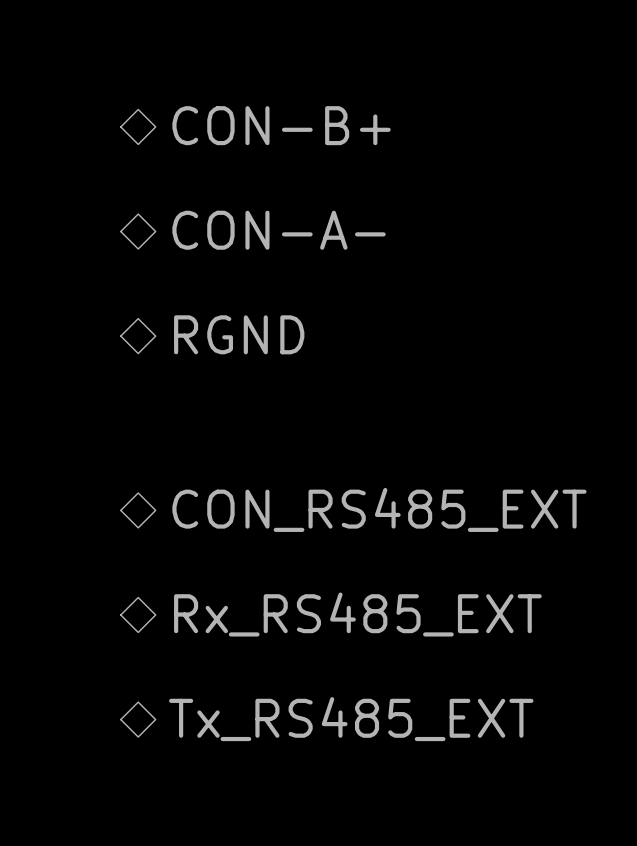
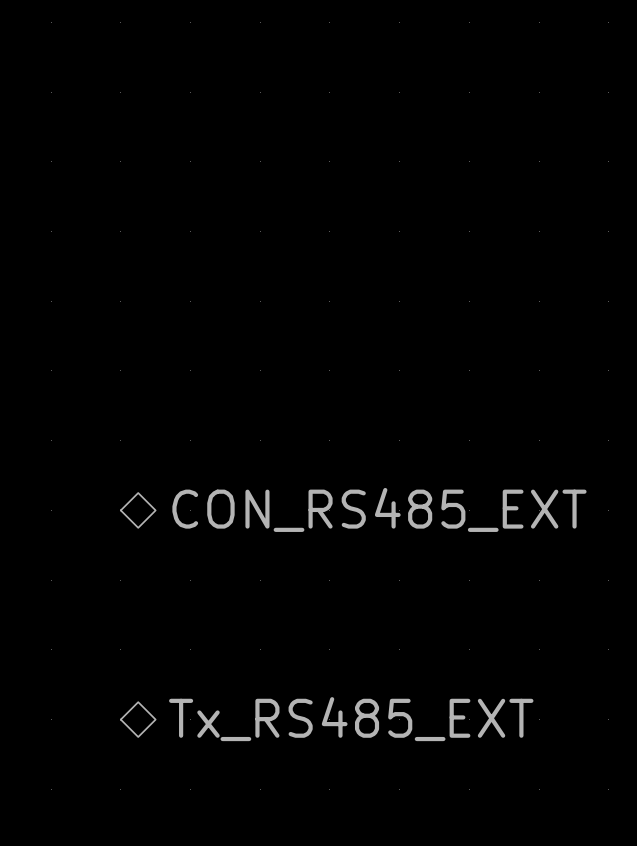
hierarchical label: CON-B+ (281, 125) -> none
hierarchical label: CON-A- (279, 230) -> none
hierarchical label: RGND (239, 334) -> none
hierarchical label: Rx_RS485_EXT (357, 614) -> none

